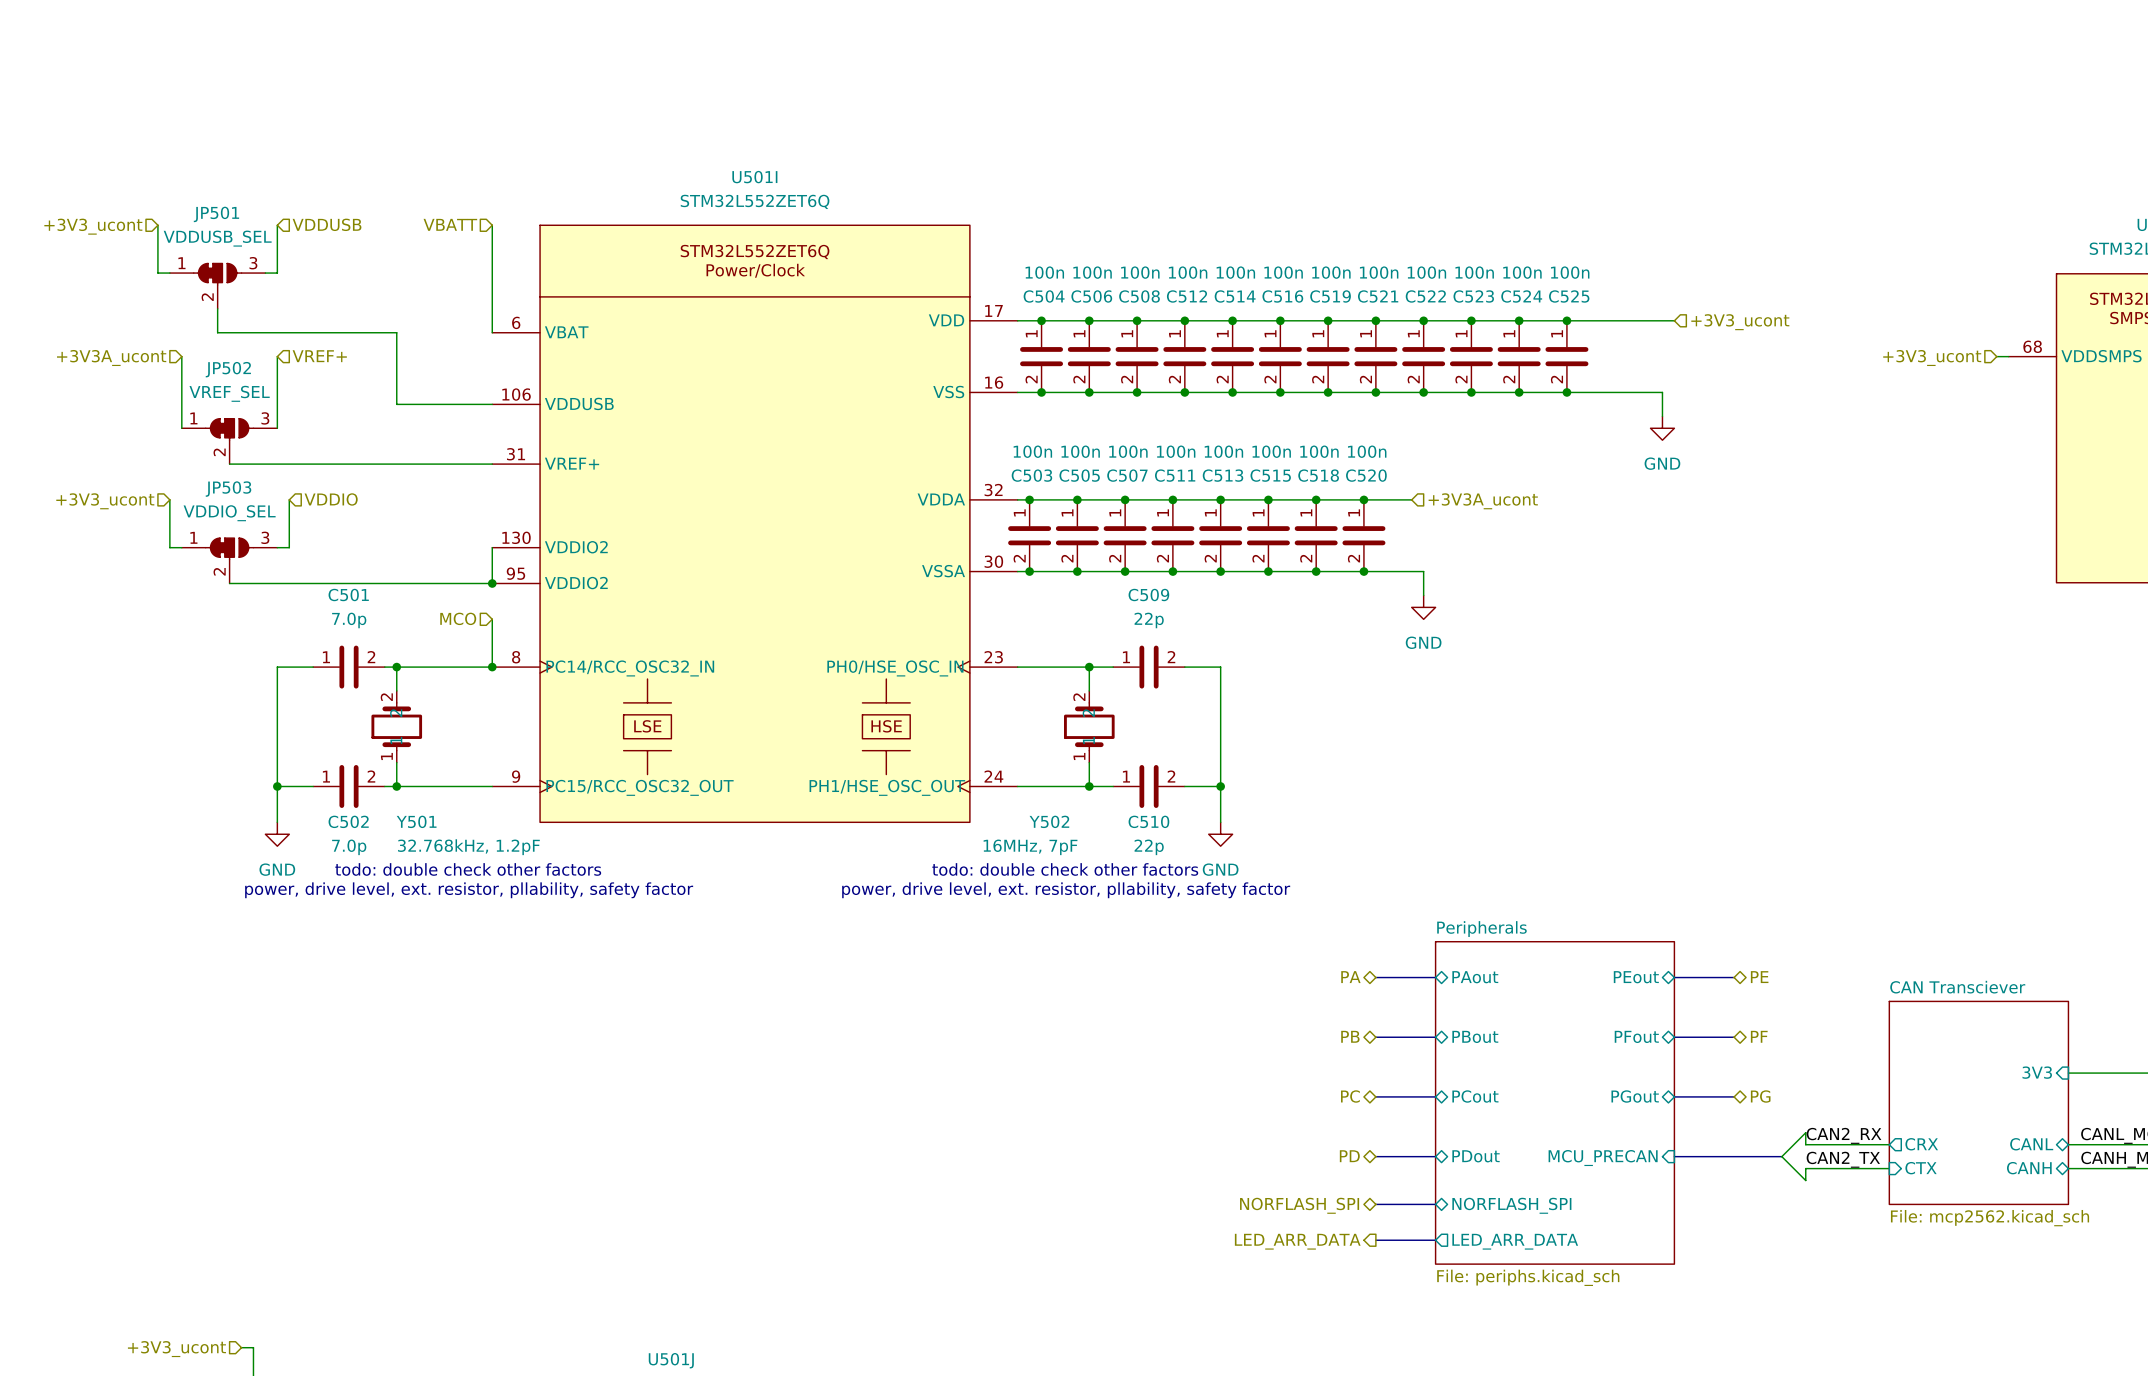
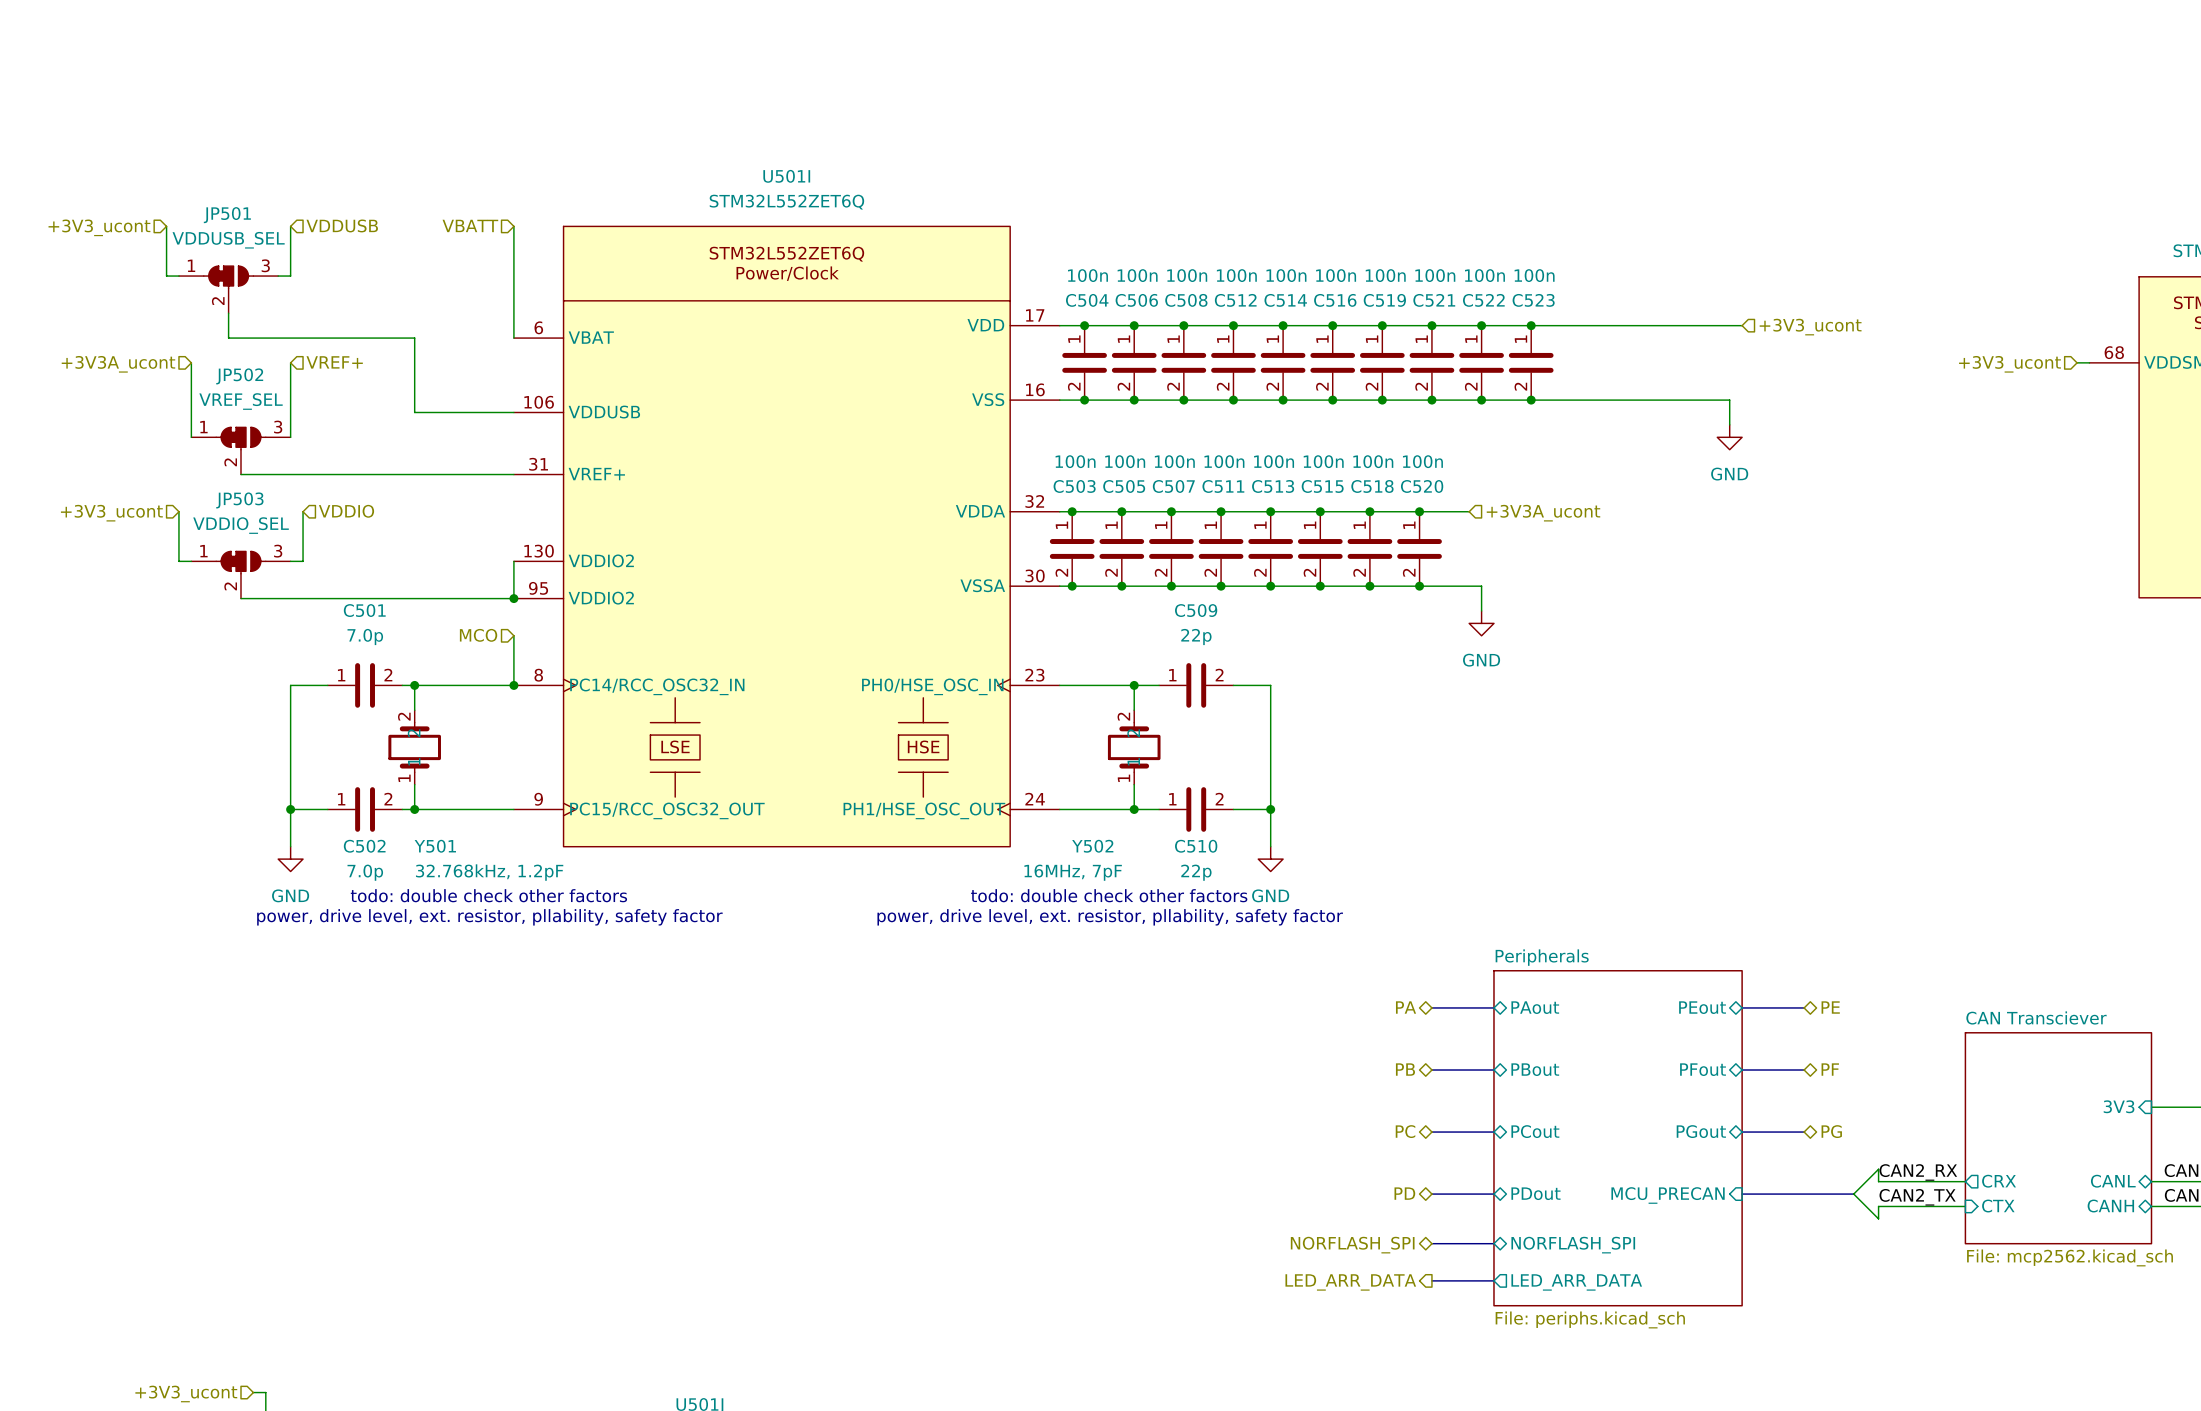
junction: (1519, 320) -> none
junction: (1566, 320) -> none
C524: 100n (1519, 356) -> none
C525: 100n (1566, 356) -> none
junction: (1519, 392) -> none
junction: (1566, 392) -> none

